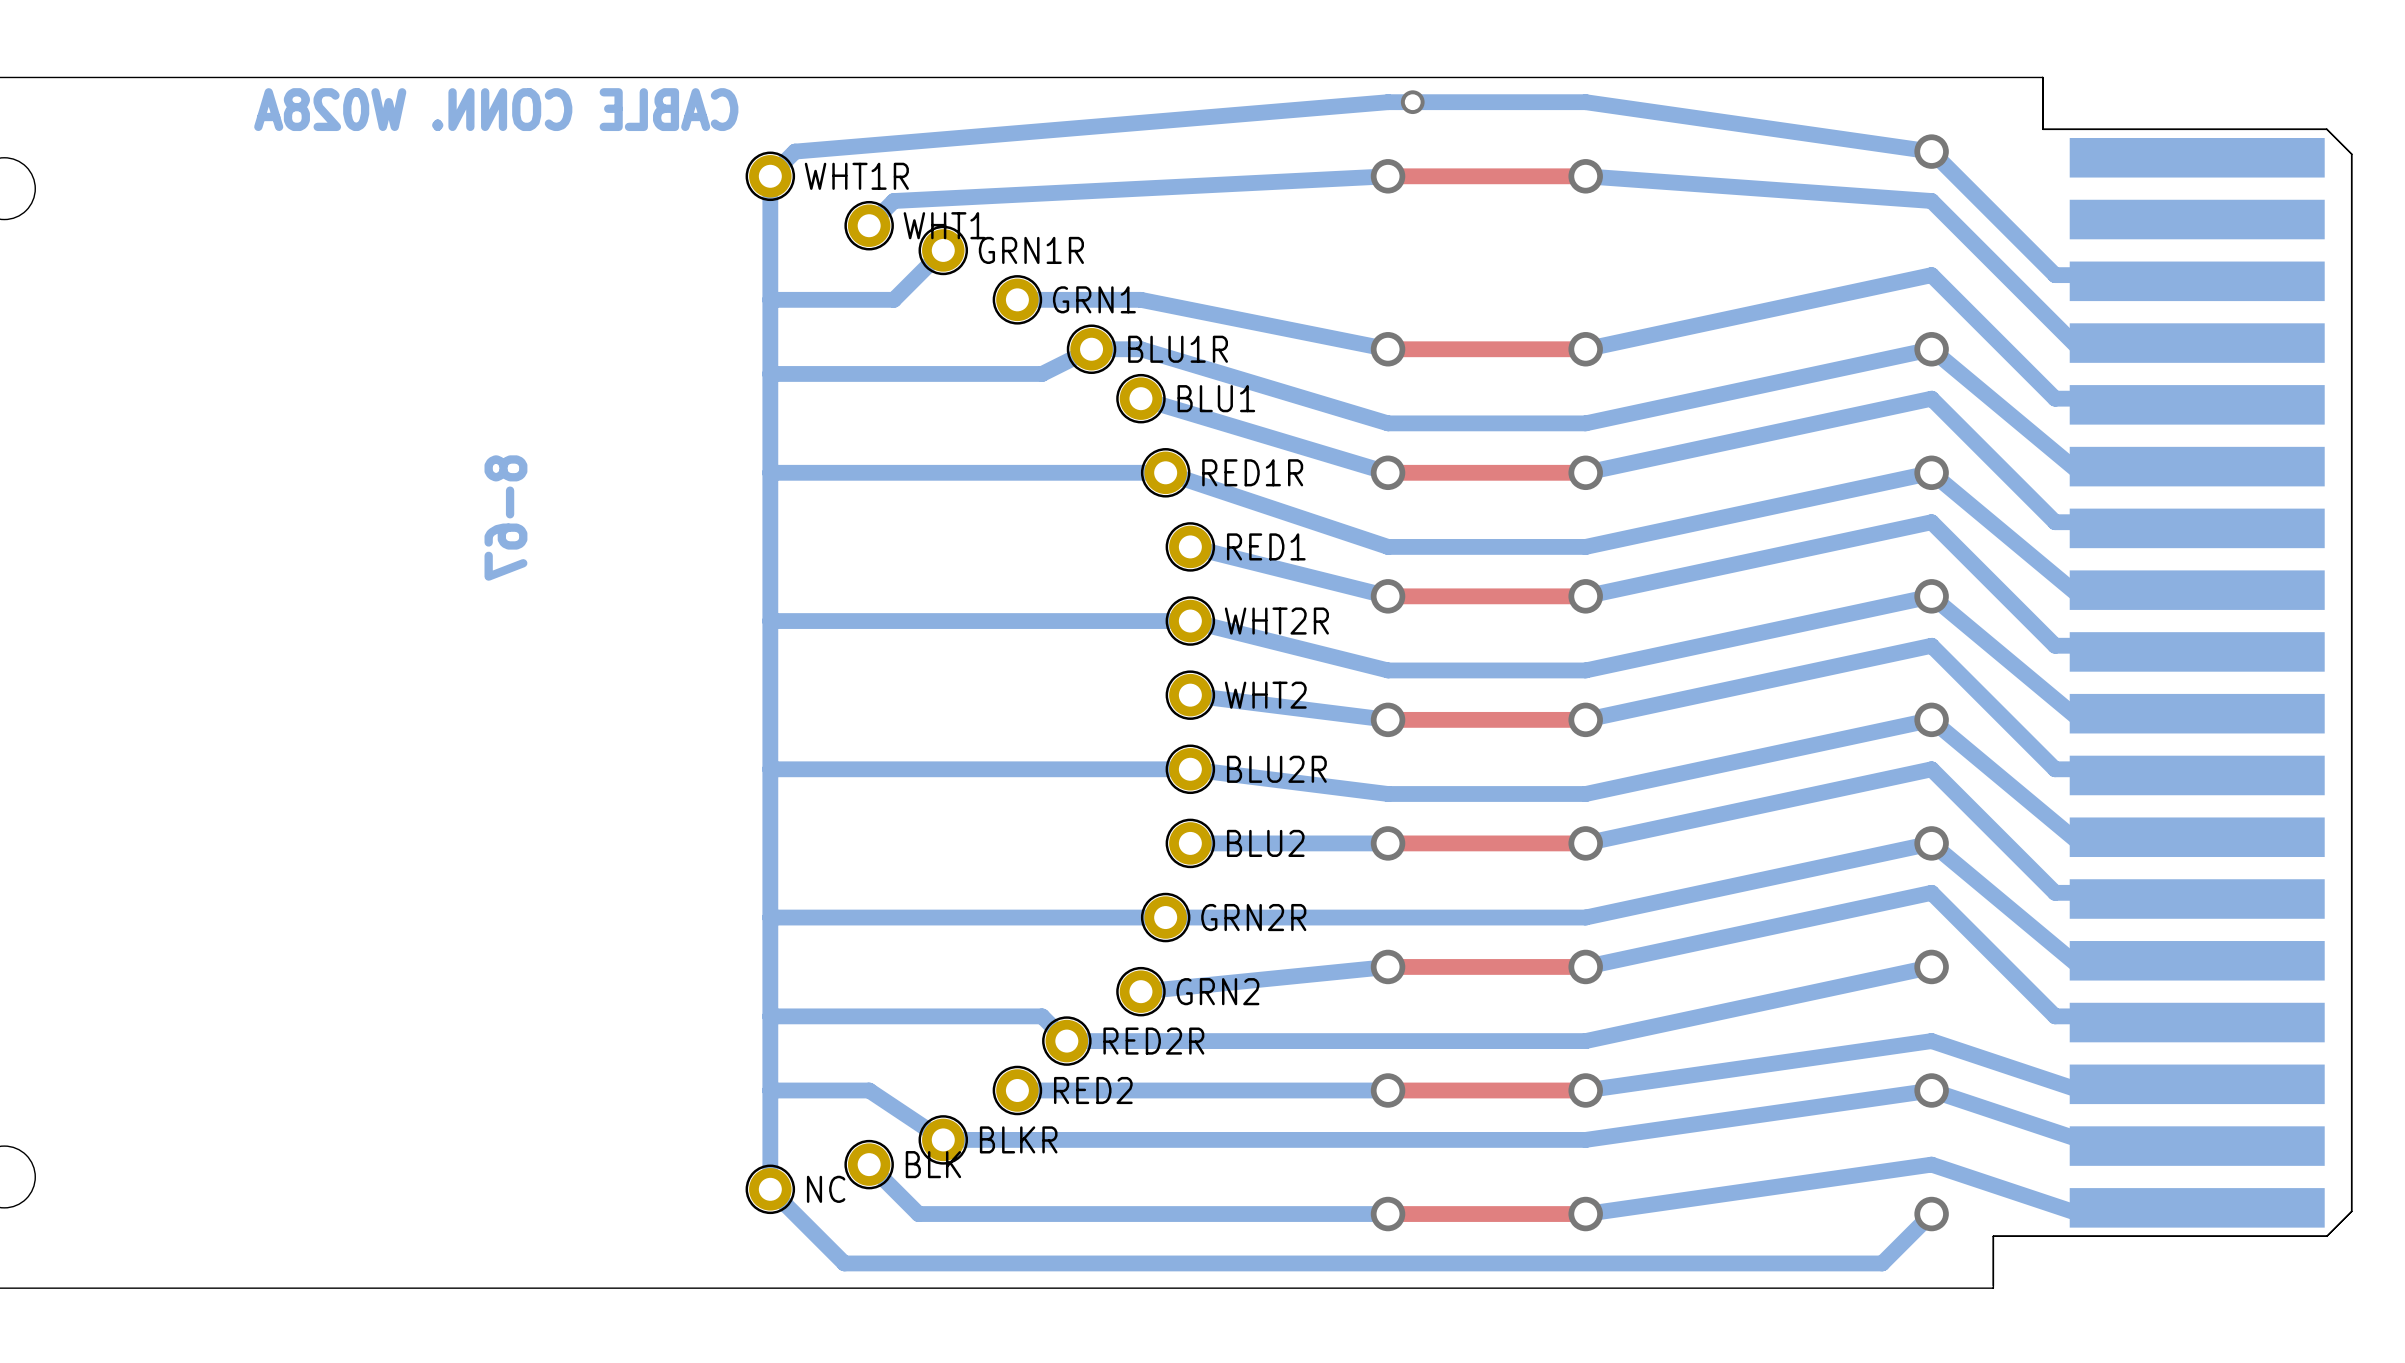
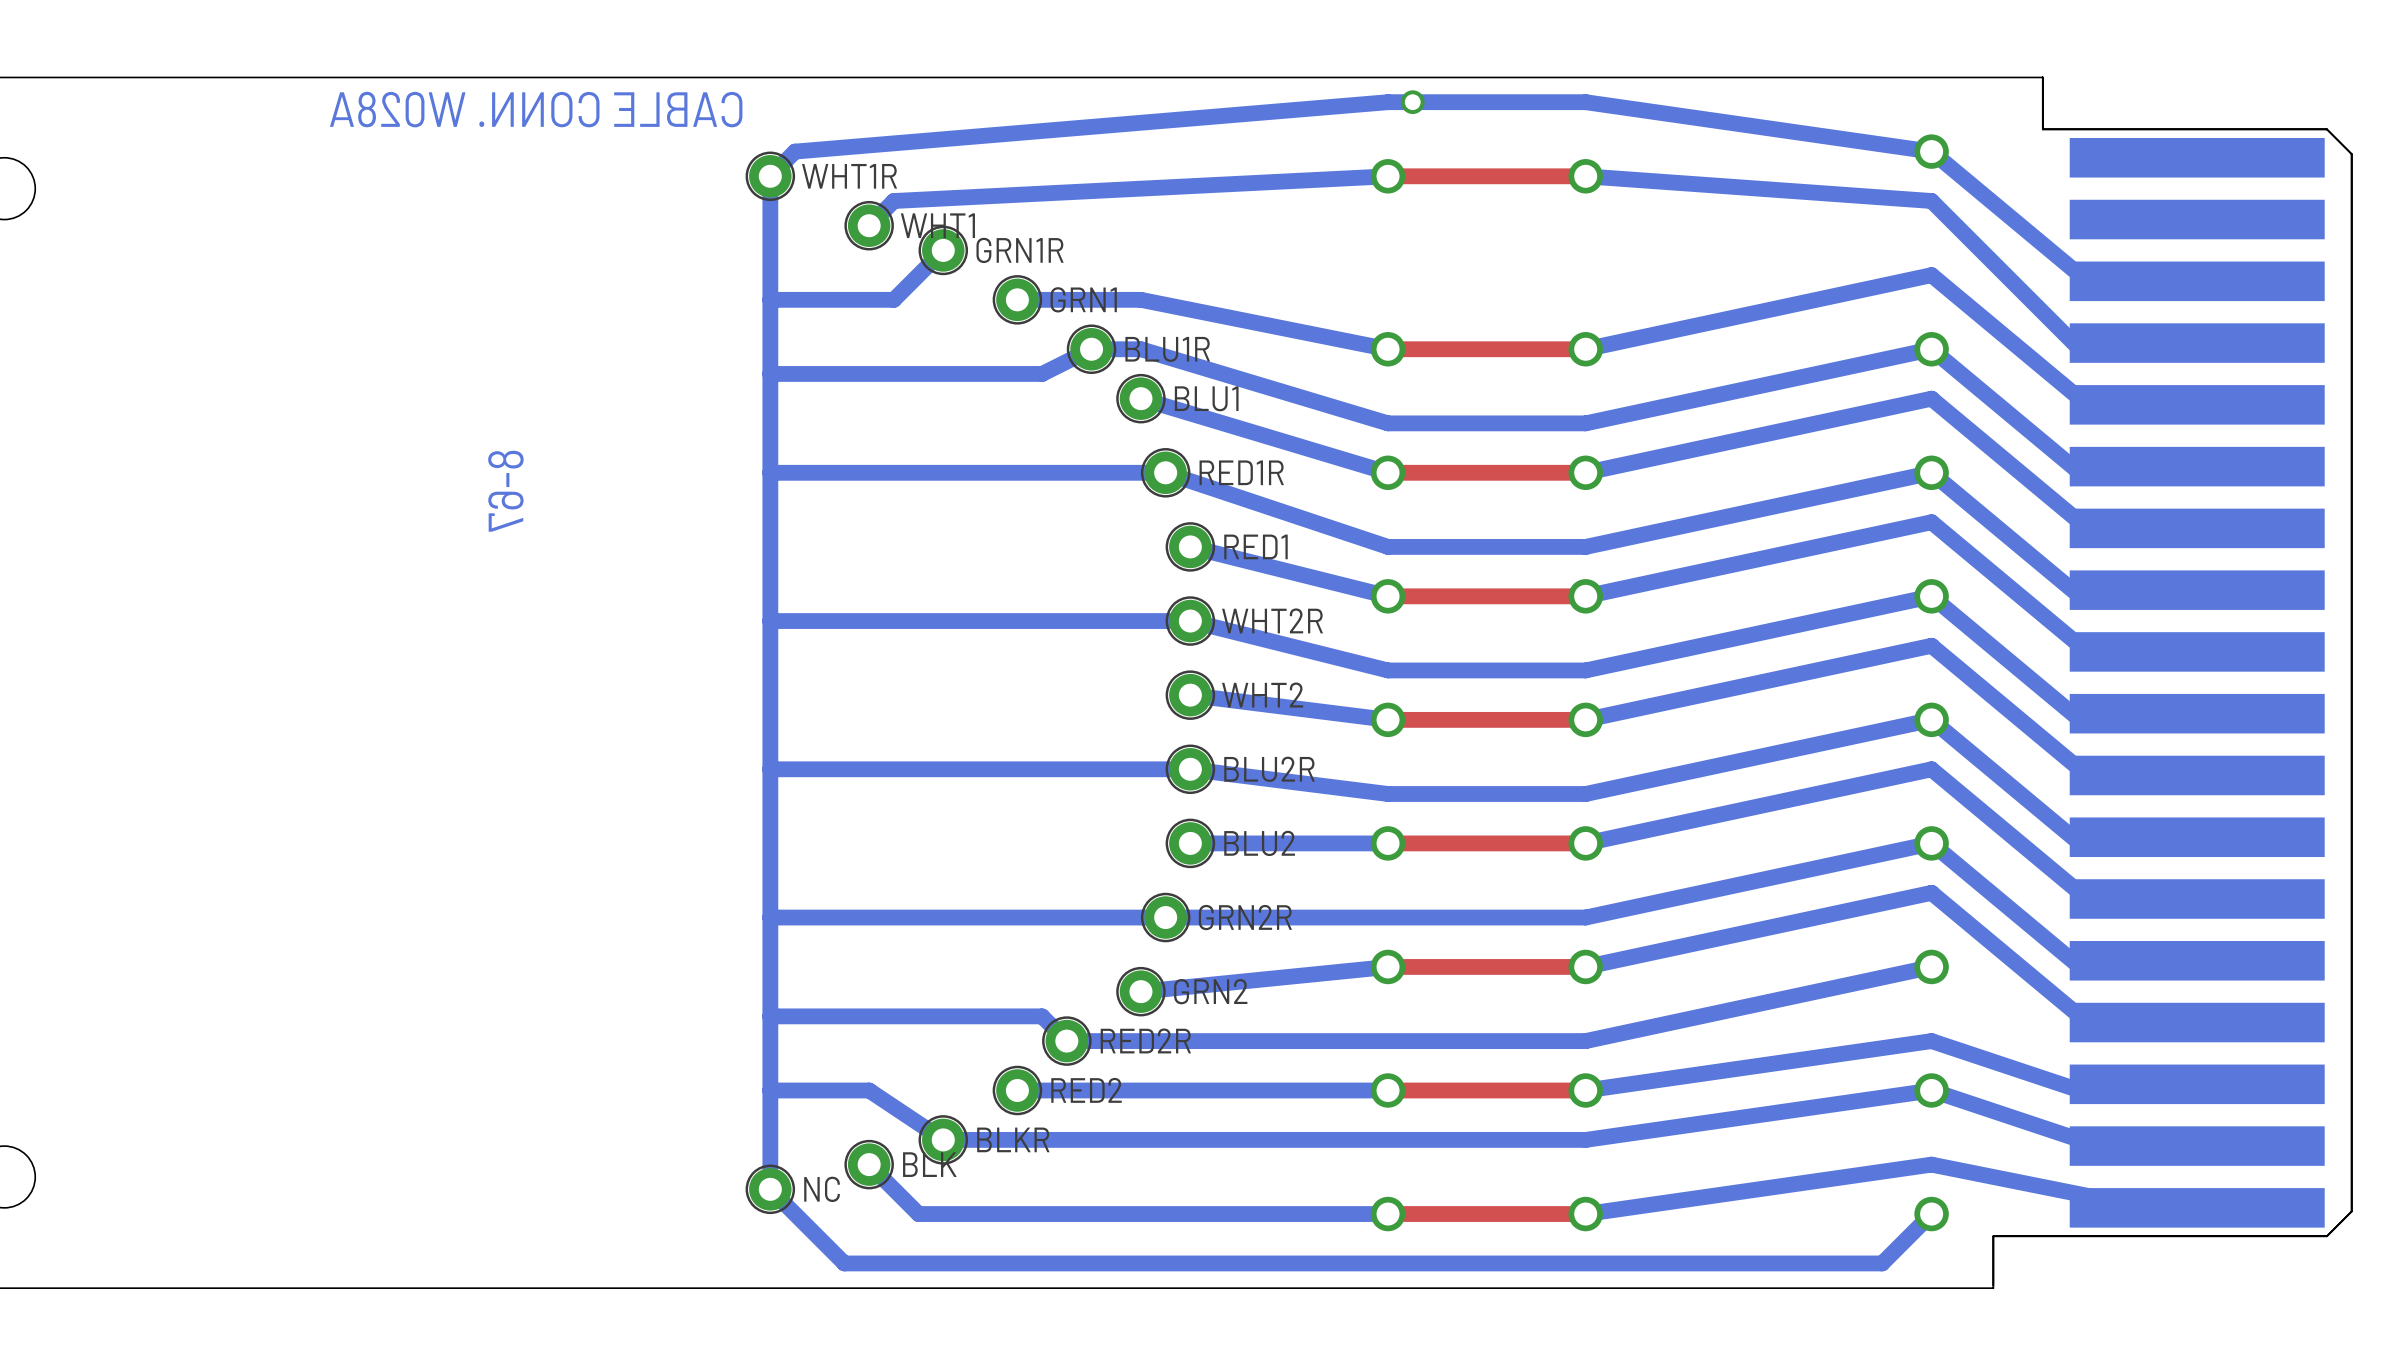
bottom track: (1931, 151) (2055, 275) (2079, 275) -> (1931, 151) (2079, 275)
bottom track: (1931, 275) (2055, 398) (2079, 398) -> (1931, 275) (2079, 398)
bottom track: (1931, 398) (2055, 522) (2079, 522) -> (1931, 398) (2079, 522)
bottom track: (1931, 522) (2055, 645) (2079, 645) -> (1931, 522) (2079, 645)
bottom track: (1931, 645) (2055, 769) (2079, 769) -> (1931, 645) (2079, 769)
bottom track: (1931, 769) (2055, 892) (2079, 892) -> (1931, 769) (2079, 892)
bottom track: (1931, 892) (2055, 1016) (2079, 1016) -> (1931, 892) (2079, 1016)
bottom track: (1931, 1164) (2079, 1214) (2178, 1214) -> (1931, 1164) (2178, 1214)

